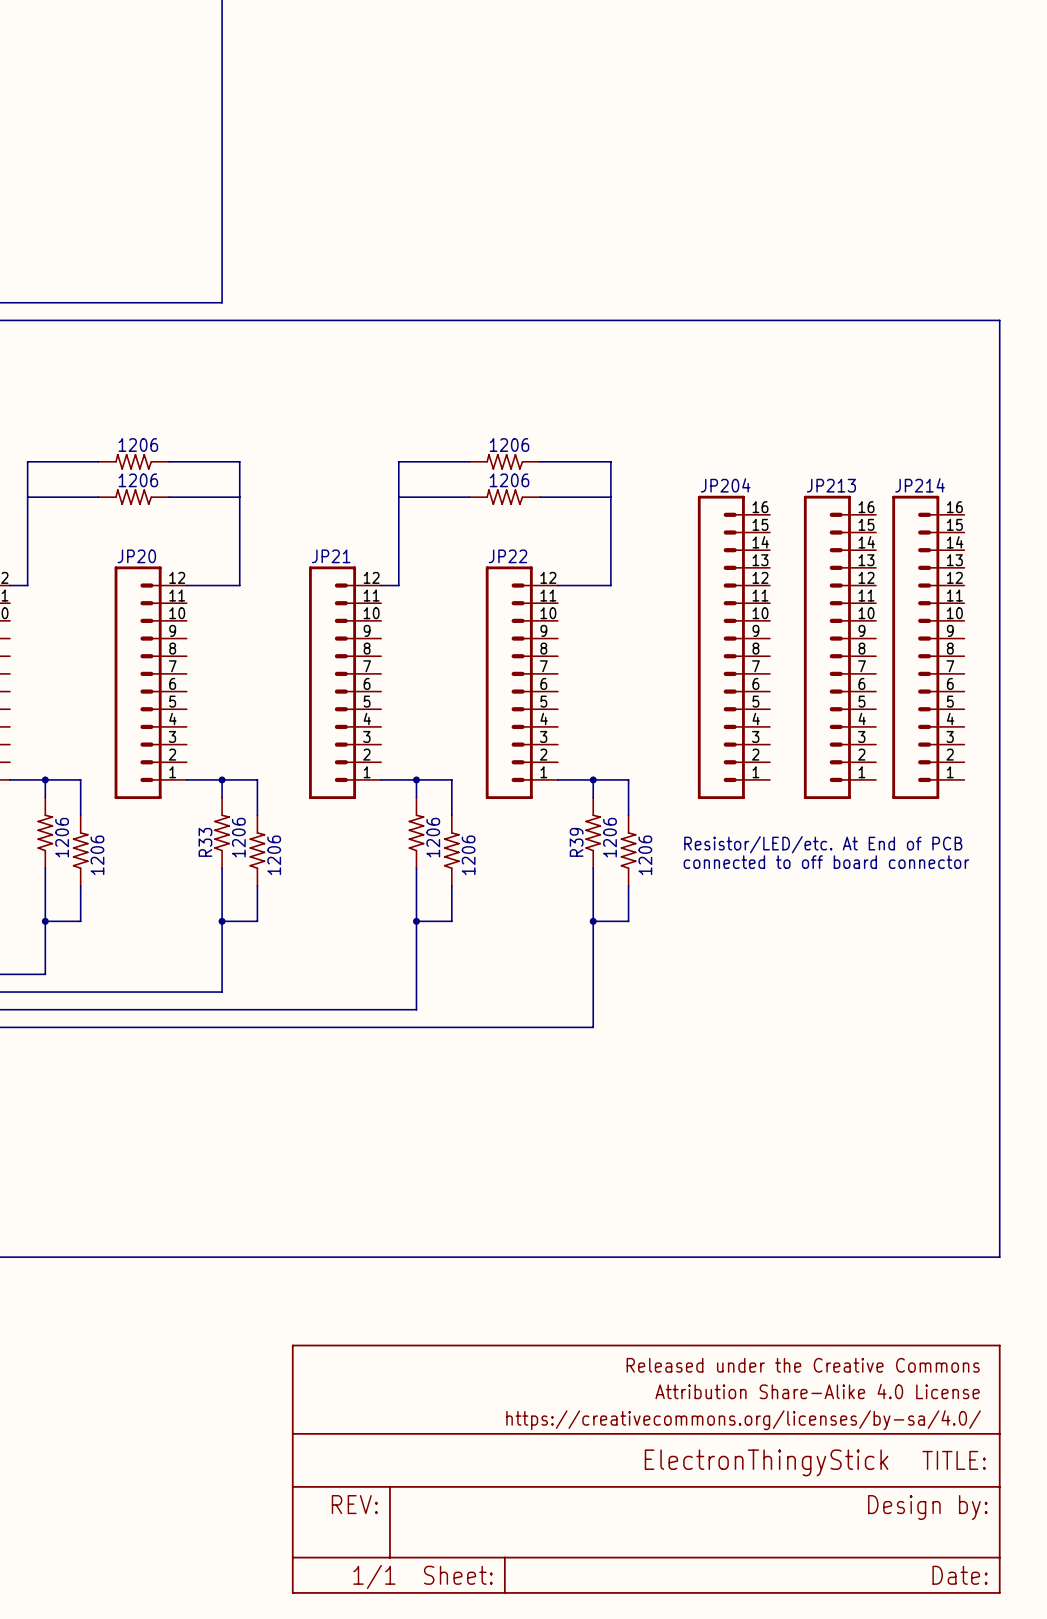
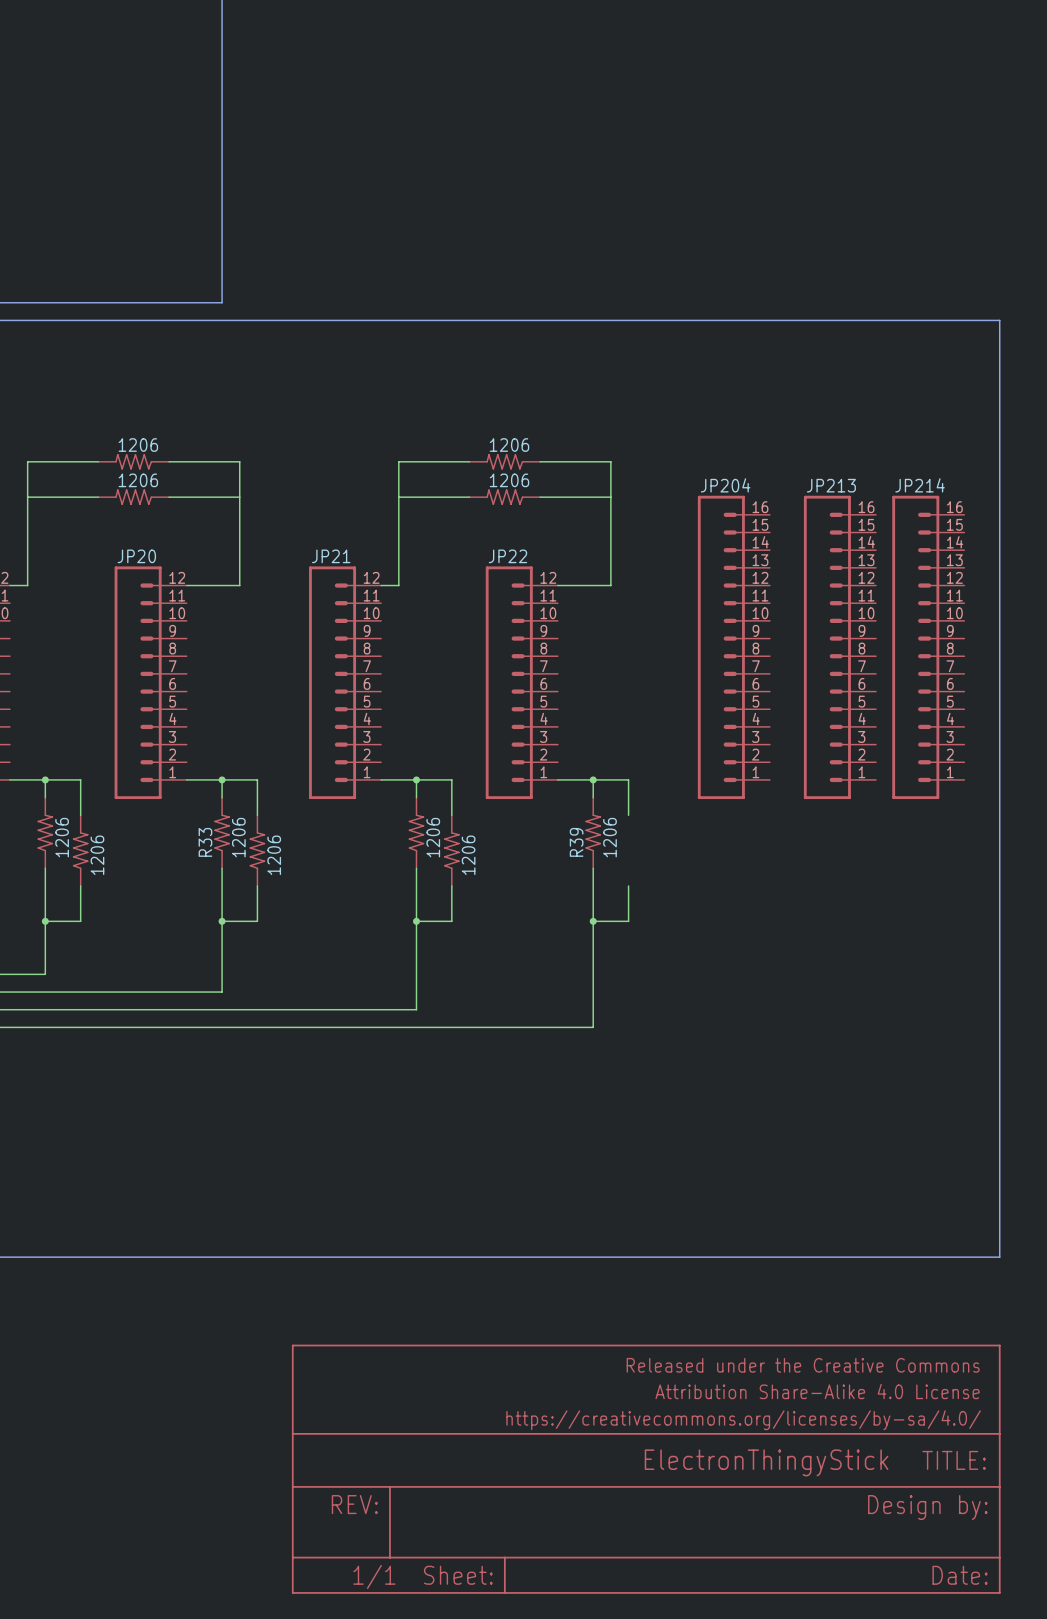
text: Resistor/LED/etc. At End of PCB (823, 844) -> none
part: 1206 (628, 850) -> none
text: connected to off board connector (826, 862) -> none

